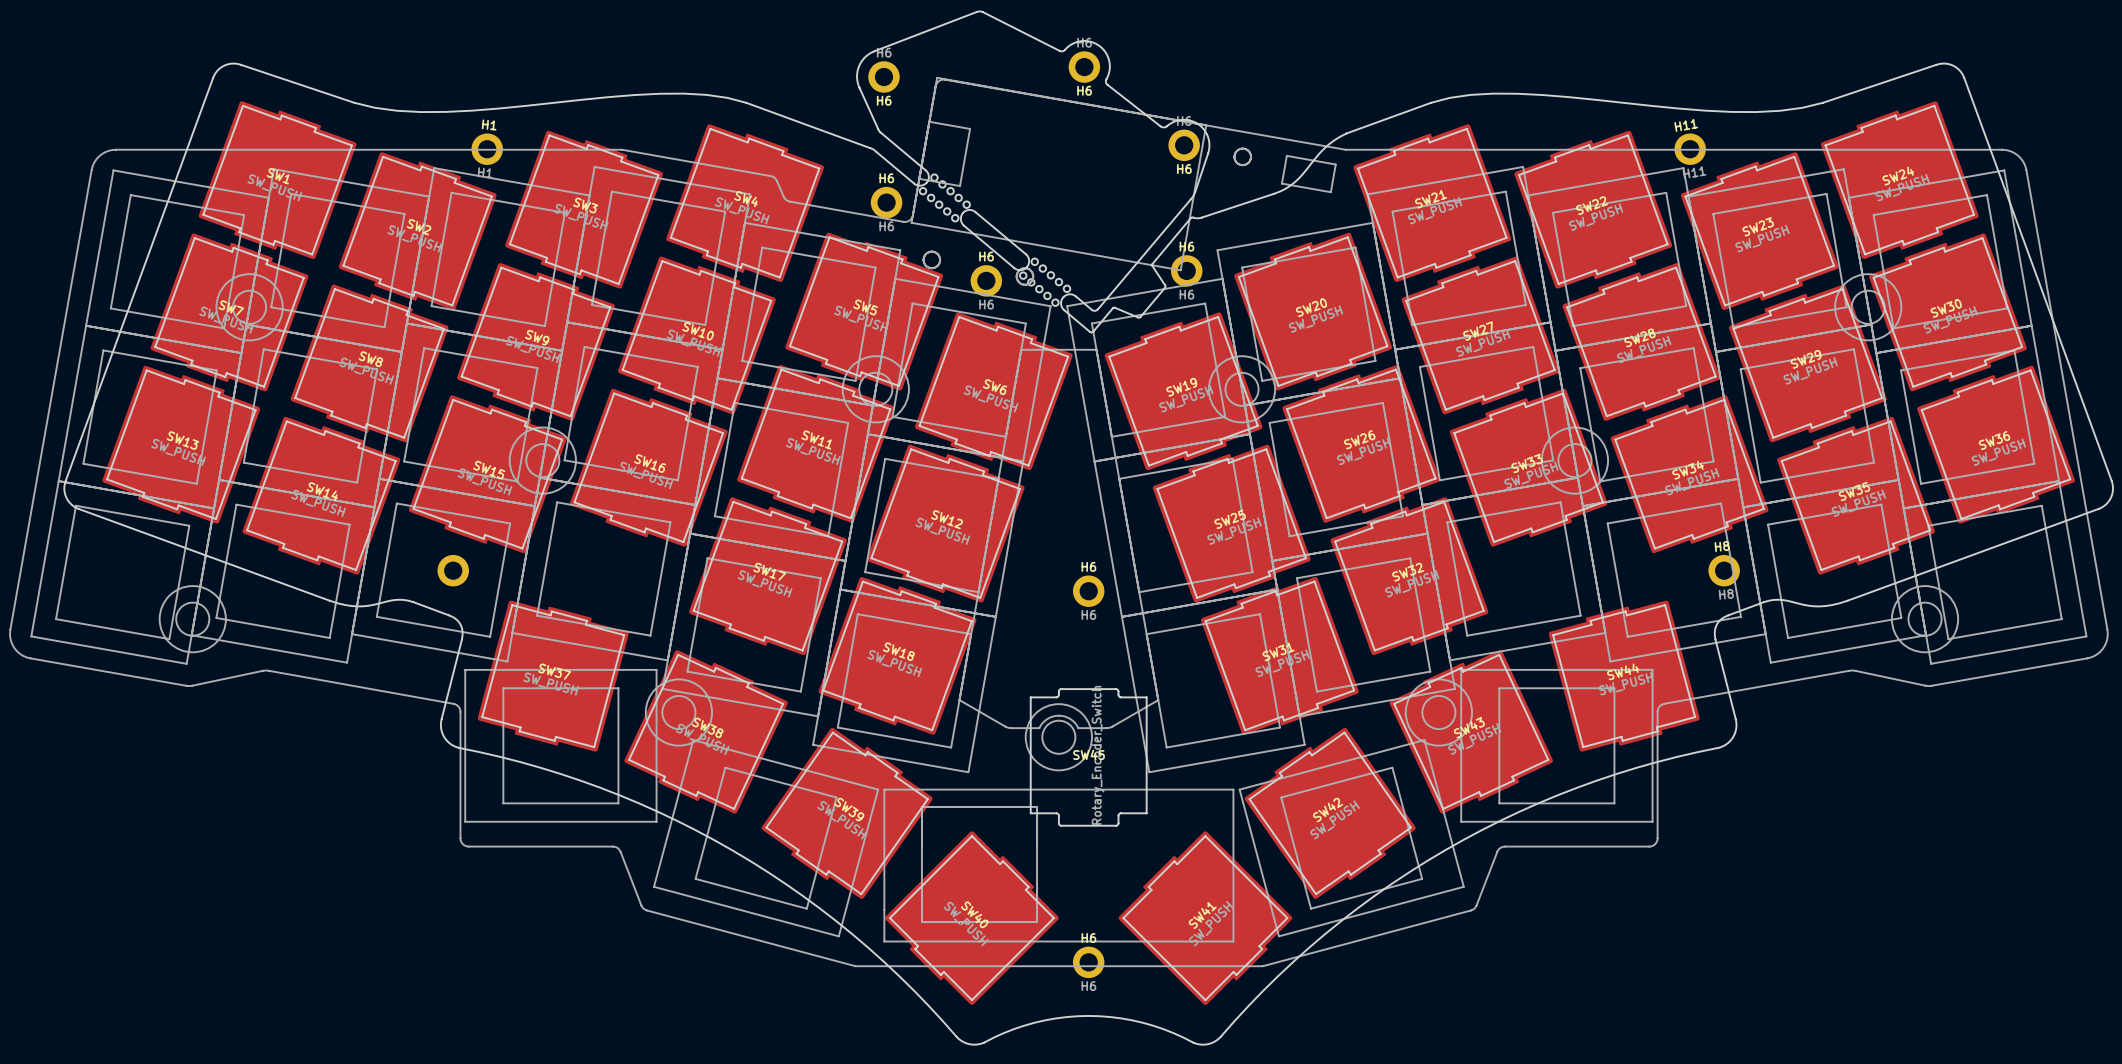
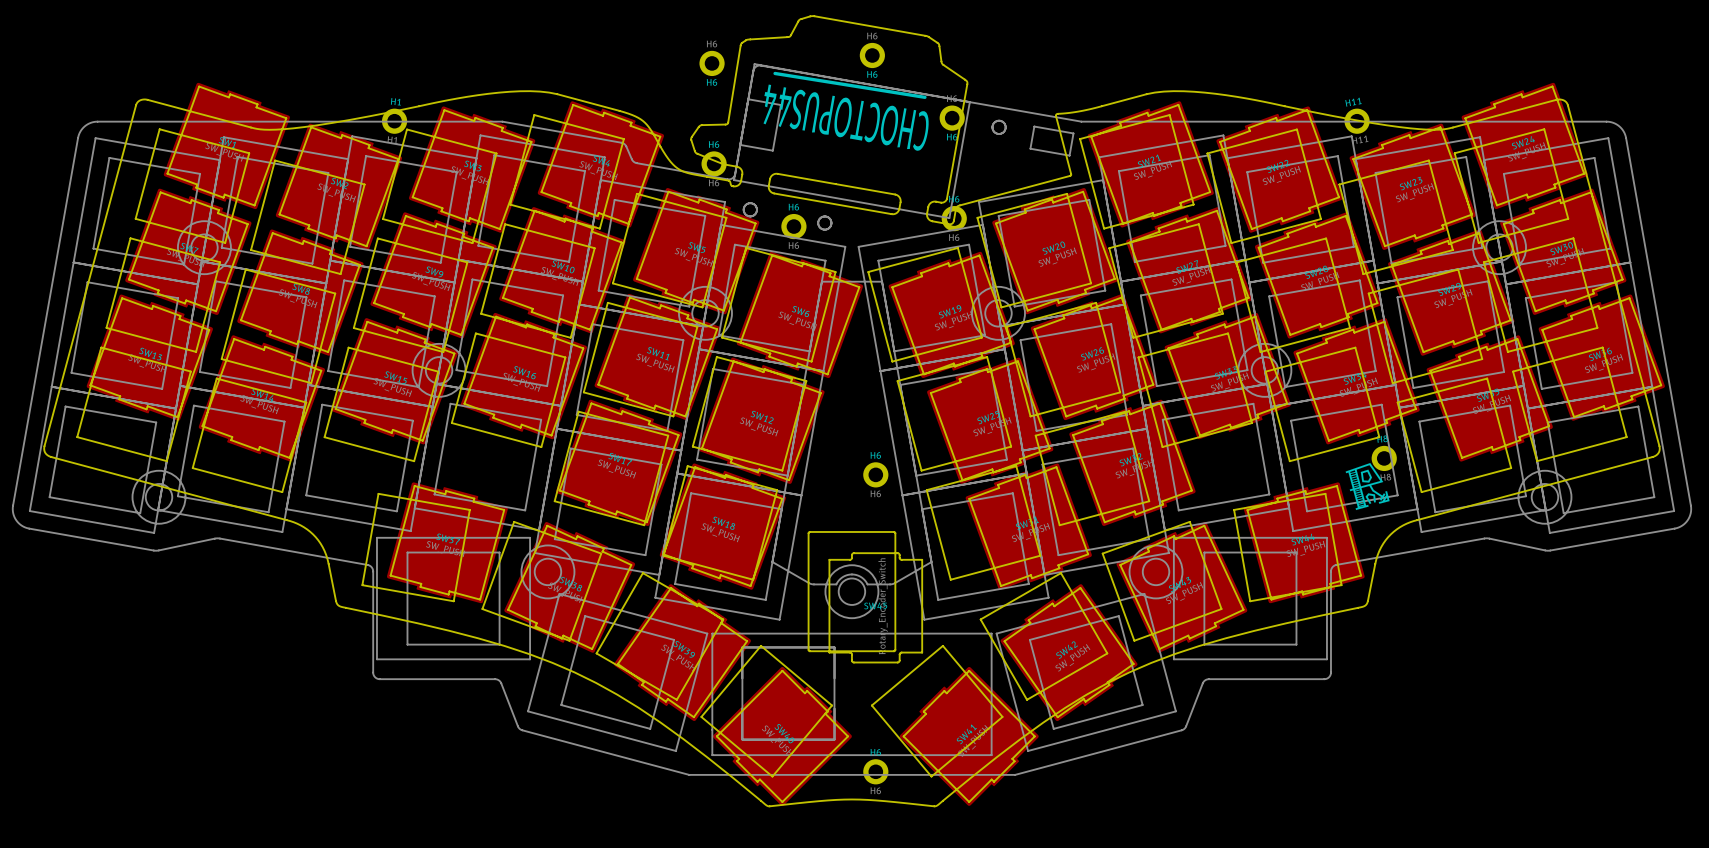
board edge: (859, 86) (878, 129) (878, 130) (879, 131) (927, 171) (928, 178) (924, 184) (914, 184) (872, 148) (746, 102) (727, 97) (706, 94) (659, 93) (472, 110) (397, 110) (354, 102) (238, 64) (224, 65) (217, 70) (213, 77) (65, 481) (64, 489) (66, 497) (71, 504) (78, 508) (337, 603) (363, 606) (403, 599) (453, 617) (460, 625) (462, 634) (441, 721) (442, 732) (449, 743) (459, 747) (540, 767) (599, 787) (676, 820) (732, 850) (802, 895) (852, 934) (899, 976) (963, 1042) (978, 1044) (1034, 1022) (1056, 1018) (1088, 1015) (1110, 1017) (1142, 1022) (1202, 1044) (1210, 1043) (1218, 1038) (1278, 976) (1341, 920) (1391, 883) (1445, 850) (1519, 811) (1577, 787) (1636, 767) (1718, 747) (1727, 743) (1735, 732) (1736, 721) (1714, 634) (1716, 625) (1723, 617) (1773, 599) (1813, 606) (1839, 603) (2098, 508) (2107, 502) (2112, 495) (2111, 481) (1964, 77) (1957, 68) (1950, 64) (1936, 64) (1822, 102) (1780, 110) (1705, 110) (1517, 93) (1470, 94) (1431, 102) (1339, 136) (1324, 148) (1295, 182) (1280, 191) (1201, 217) (1191, 217) (1152, 264) (1165, 286) (1140, 316) (1138, 317) (1113, 307) (1091, 332) (1063, 309) (1062, 299) (1066, 295) (1073, 294) (1092, 310) (1097, 309) (1192, 197) (1209, 150) (1208, 140) (1202, 128) (1195, 122) (1185, 119) (1161, 126) (1107, 84) (1105, 81) (1109, 70) (1109, 61) (1103, 49) (1096, 44) (1087, 41) (1078, 41) (1060, 51) (980, 11) (868, 54) (861, 61) (857, 70) (857, 79) (857, 82) (858, 86) (860, 88) -> none
line: none -> (775, 73) (924, 97)
board edge: none -> (1556, 99) (1560, 99) (1563, 100) (1567, 105) (1659, 446) (1657, 453) (1652, 457) (1406, 523) (1390, 534) (1381, 547) (1376, 559) (1367, 601) (1364, 606) (1225, 638) (1174, 654) (1129, 672) (1086, 694) (1043, 722) (935, 806) (851, 799) (767, 806) (660, 722) (617, 694) (574, 672) (529, 654) (478, 638) (339, 606) (336, 601) (324, 550) (315, 537) (300, 525) (51, 457) (44, 450) (136, 105) (141, 99) (254, 128) (269, 129) (332, 122) (477, 95) (520, 91) (549, 92) (635, 116) (646, 124) (668, 158) (677, 168) (691, 173) (729, 180) (731, 185) (735, 186) (740, 181) (742, 173) (740, 168) (696, 153) (691, 137) (700, 125) (727, 123) (741, 43) (748, 39) (789, 36) (799, 19) (814, 16) (927, 36) (938, 44) (942, 64) (967, 81) (946, 199) (942, 202) (931, 202) (927, 213) (930, 220) (950, 224) (953, 221) (958, 205) (1070, 175) (1056, 114) (1089, 109) (1146, 94) (1173, 91) (1215, 93) (1371, 122) (1434, 129) (1452, 127) (1556, 99)
drawing: none -> [77, 114, 836, 777]
drawing: none -> [868, 114, 1627, 777]
text: none -> CHOCTOPUS44 (846, 117)
part: (950, 191) -> none
part: (939, 204) -> none
board edge: (975, 212) (1027, 255) (1029, 261) (1025, 268) (1020, 270) (1014, 268) (962, 224) (960, 219) (963, 212) (969, 209) (975, 212) -> none
board edge: none -> (777, 173) (896, 194) (900, 199) (899, 209) (896, 213) (891, 214) (773, 193) (768, 188) (770, 179) (772, 174) (777, 173)
part: (1050, 275) -> none
part: (1039, 289) -> none
part: (453, 570) -> none
drawing: none -> [362, 493, 471, 602]
board edge: none -> (809, 531) (895, 532) (894, 650) (808, 650) (809, 531)

